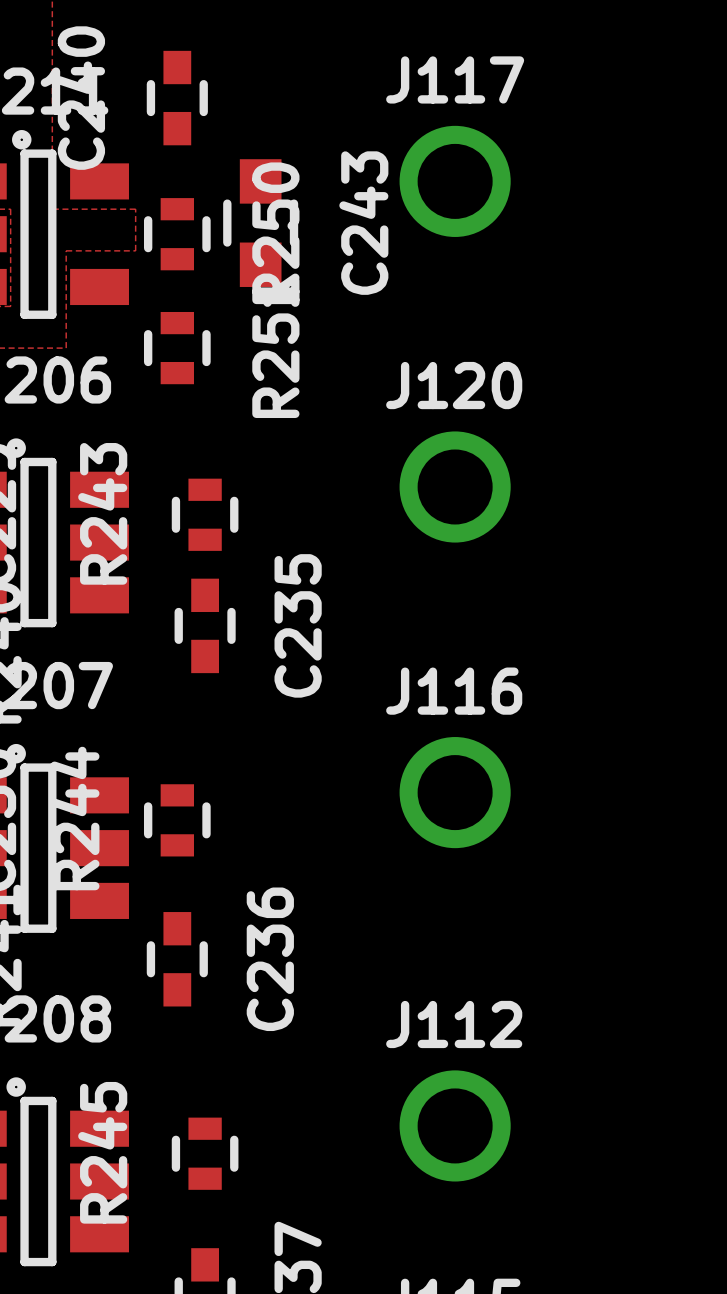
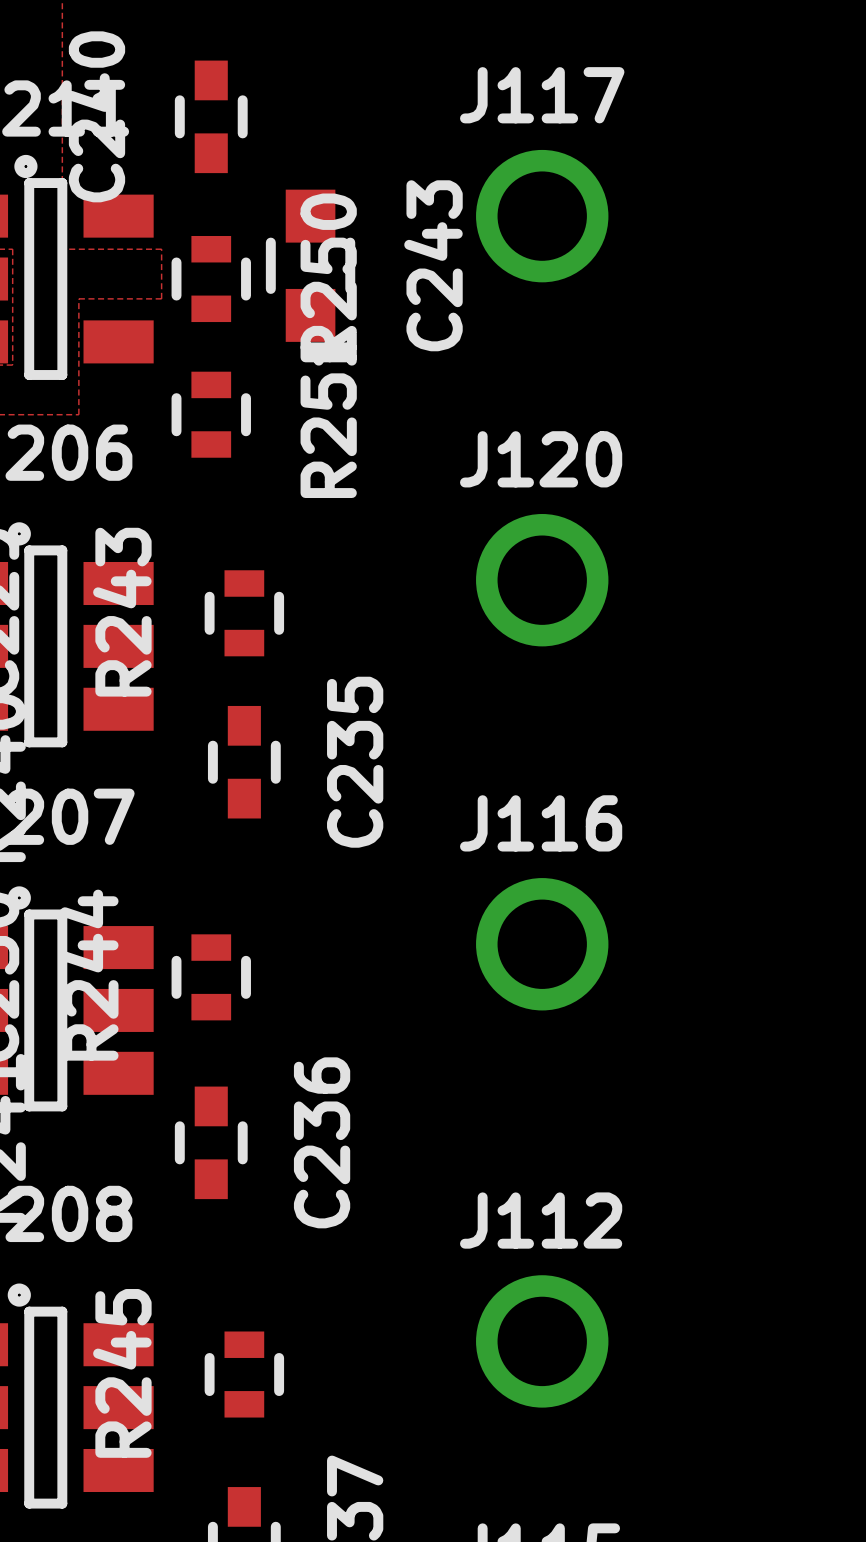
C235 position: (205, 625) -> (244, 762)

